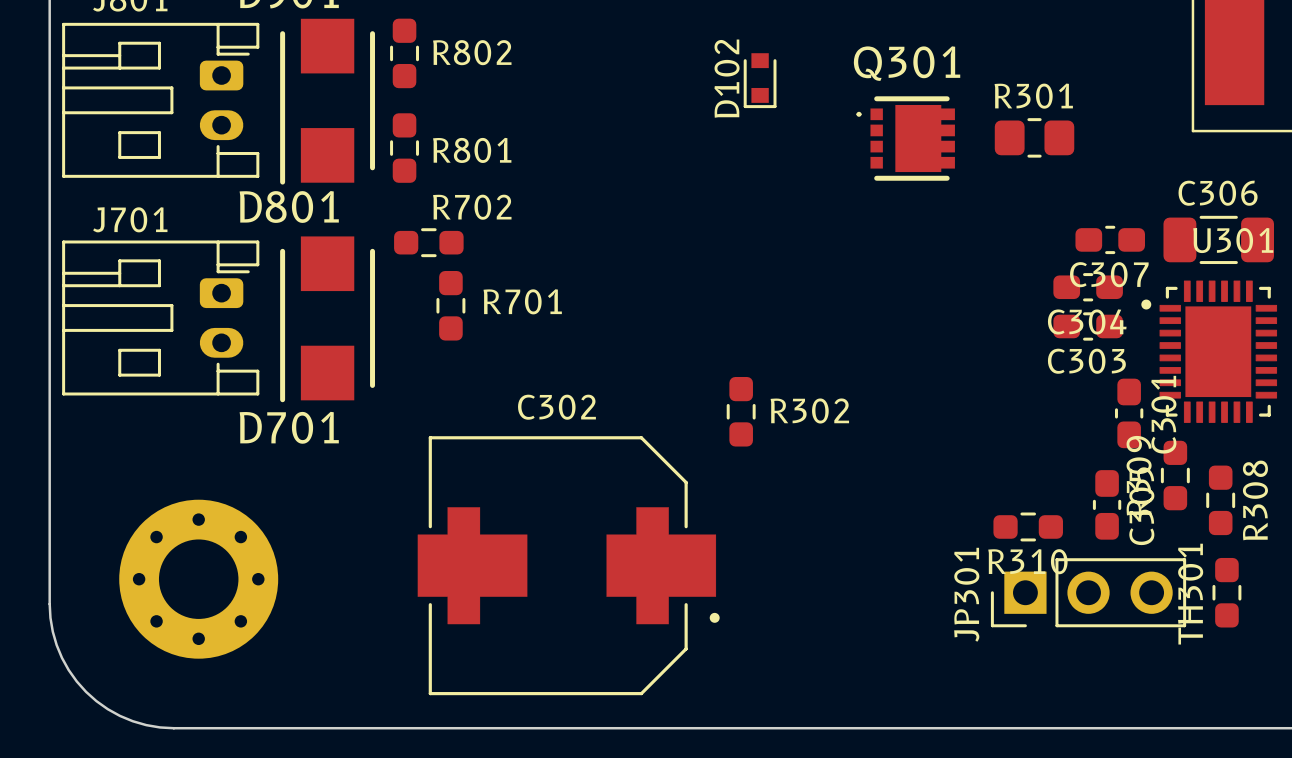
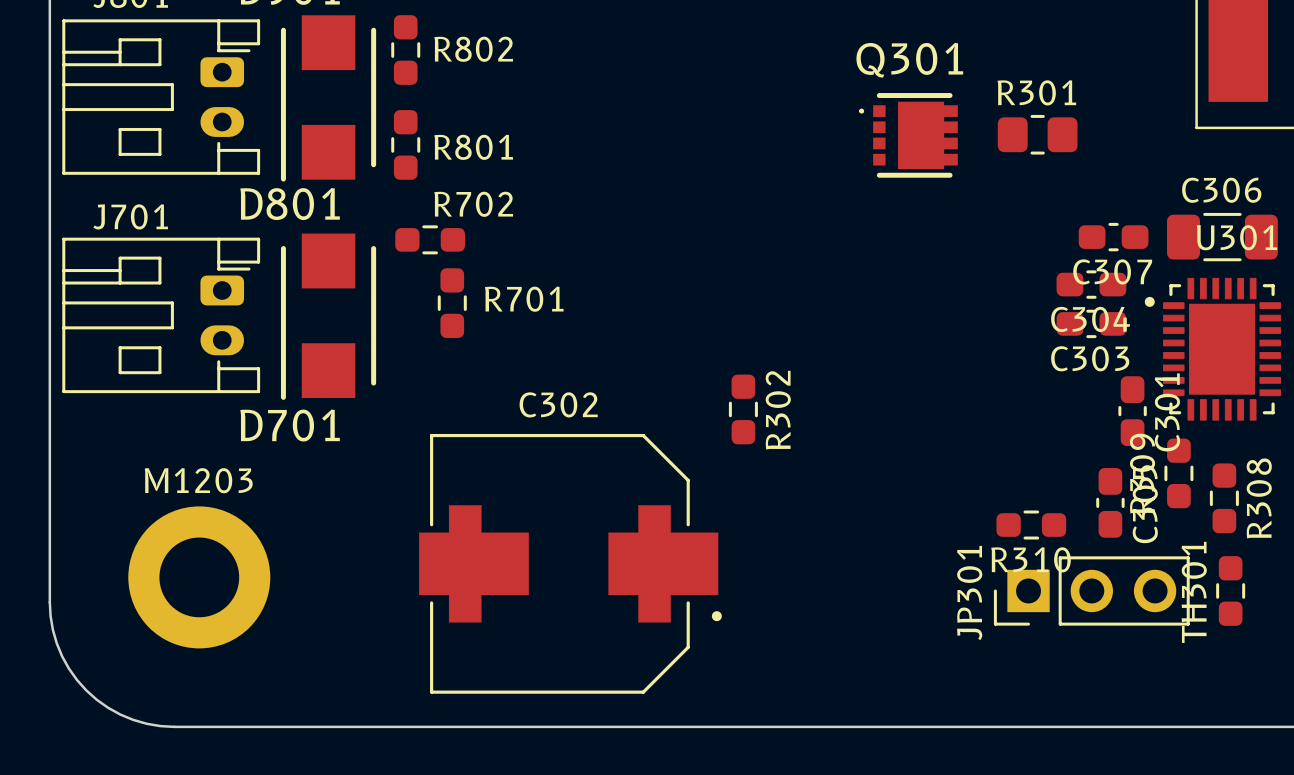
D102: (760, 80) -> none
R302 name rotation: 0° (809, 410) -> 90° counterclockwise (778, 410)
part: (198, 579) -> none
M1203: none -> (199, 577)

